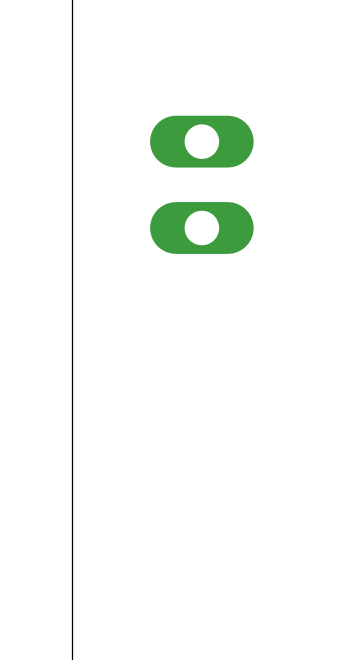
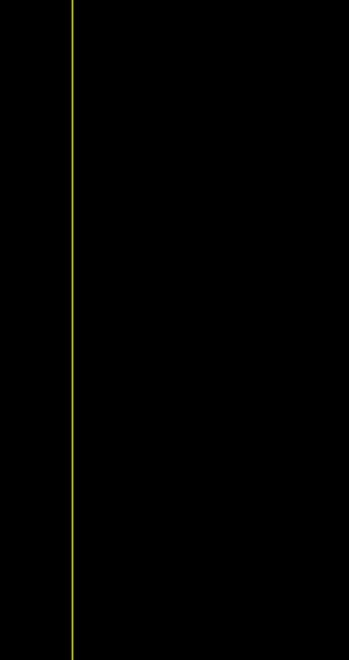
part: (201, 184) -> none

